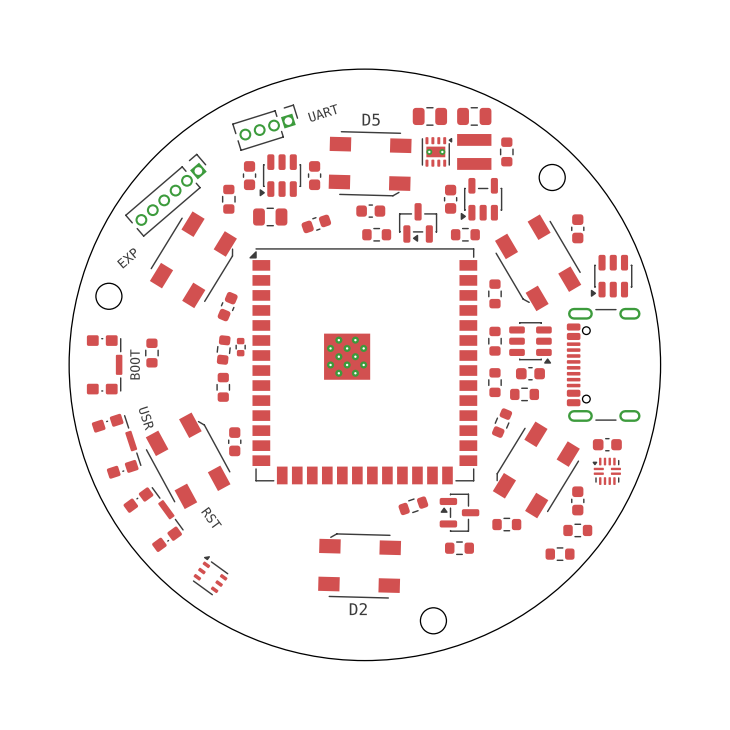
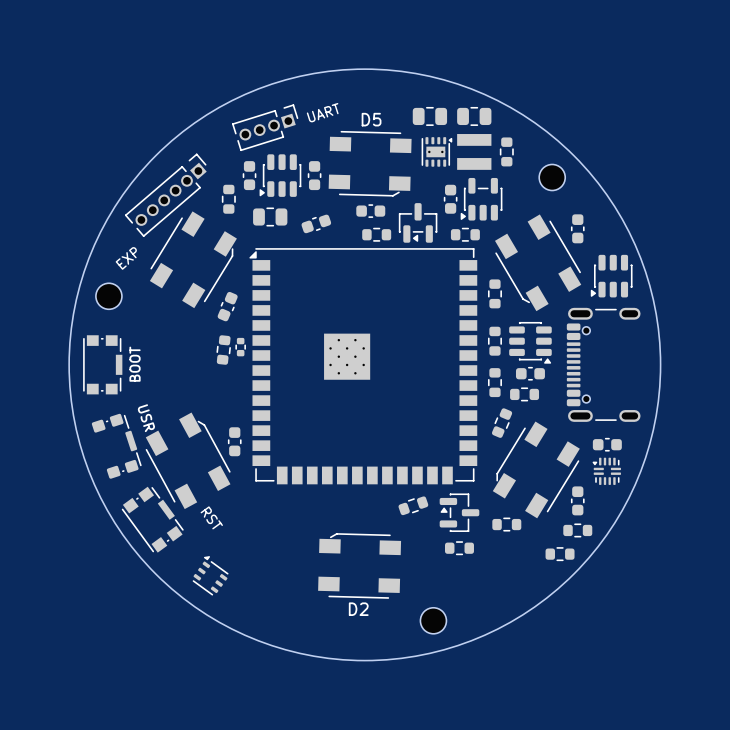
part footprint: [86, 335, 123, 395] -> [83, 335, 123, 395]
part: (151, 353) -> none
part: (223, 387) -> none
part footprint: [123, 486, 184, 552] -> [121, 486, 184, 553]

